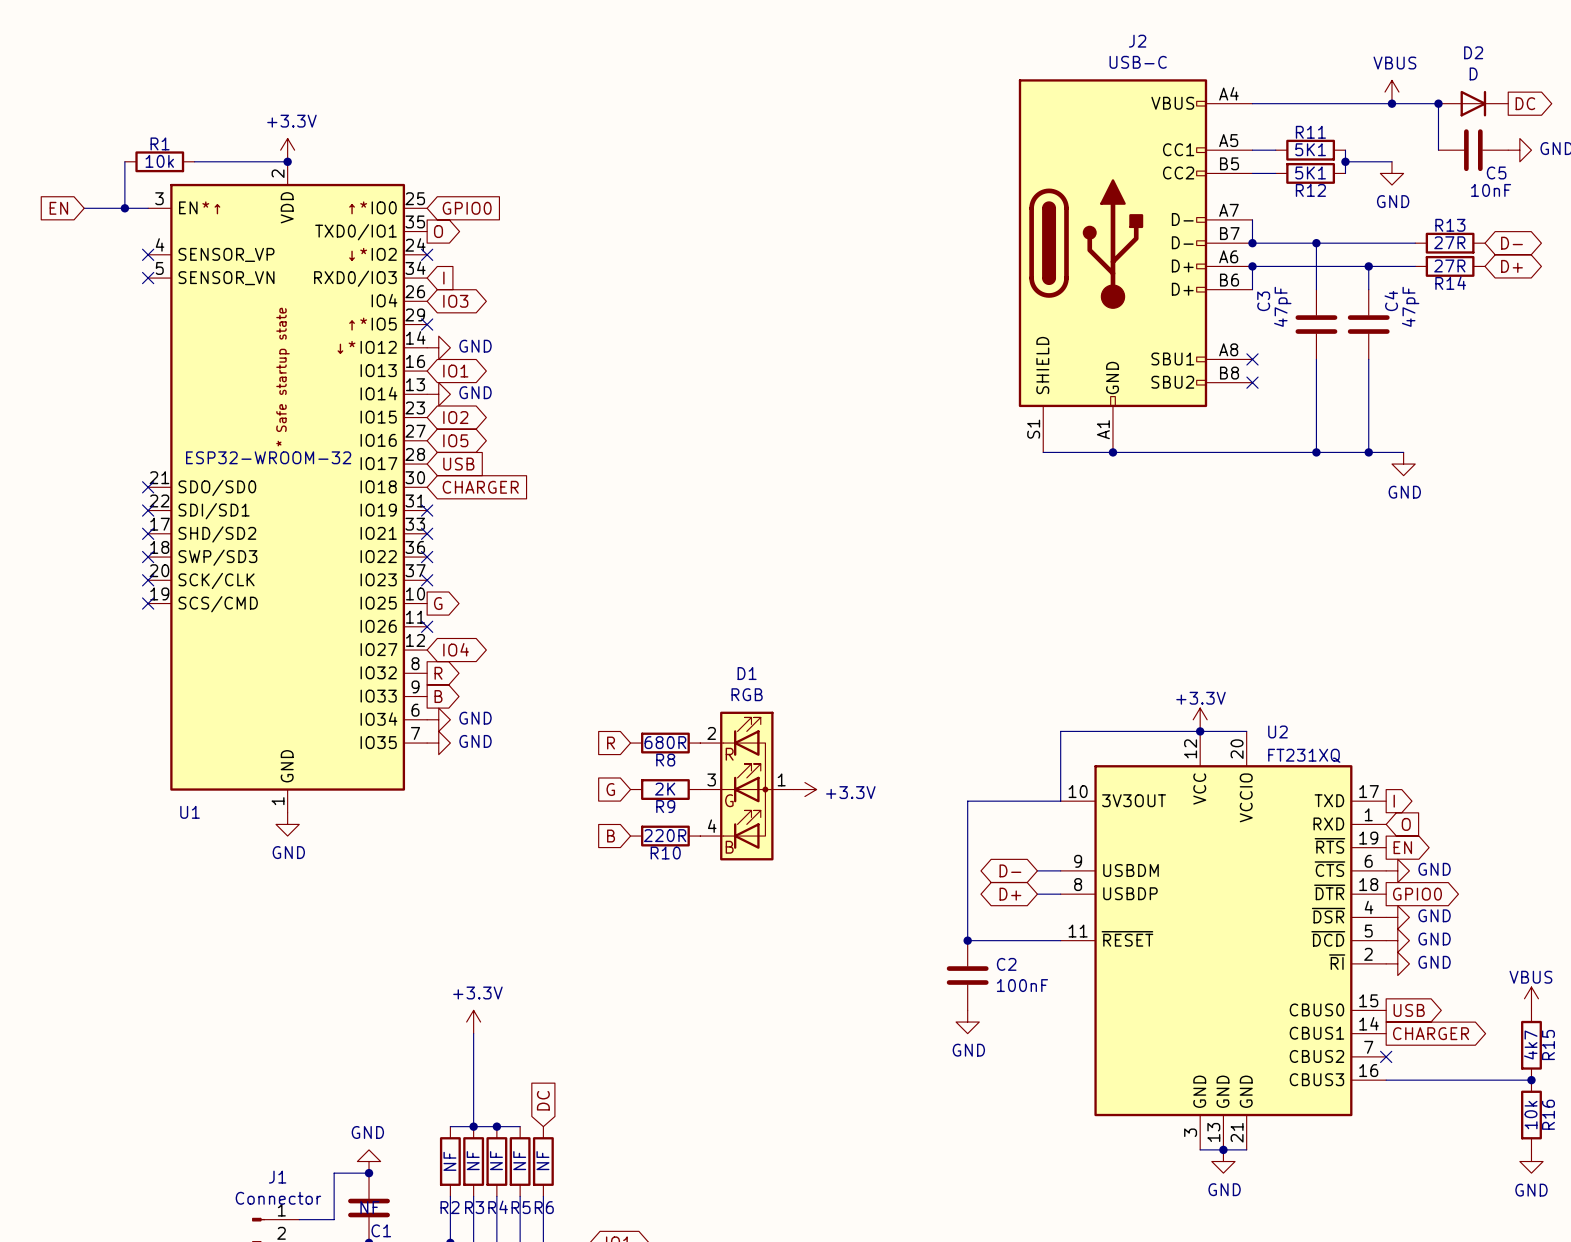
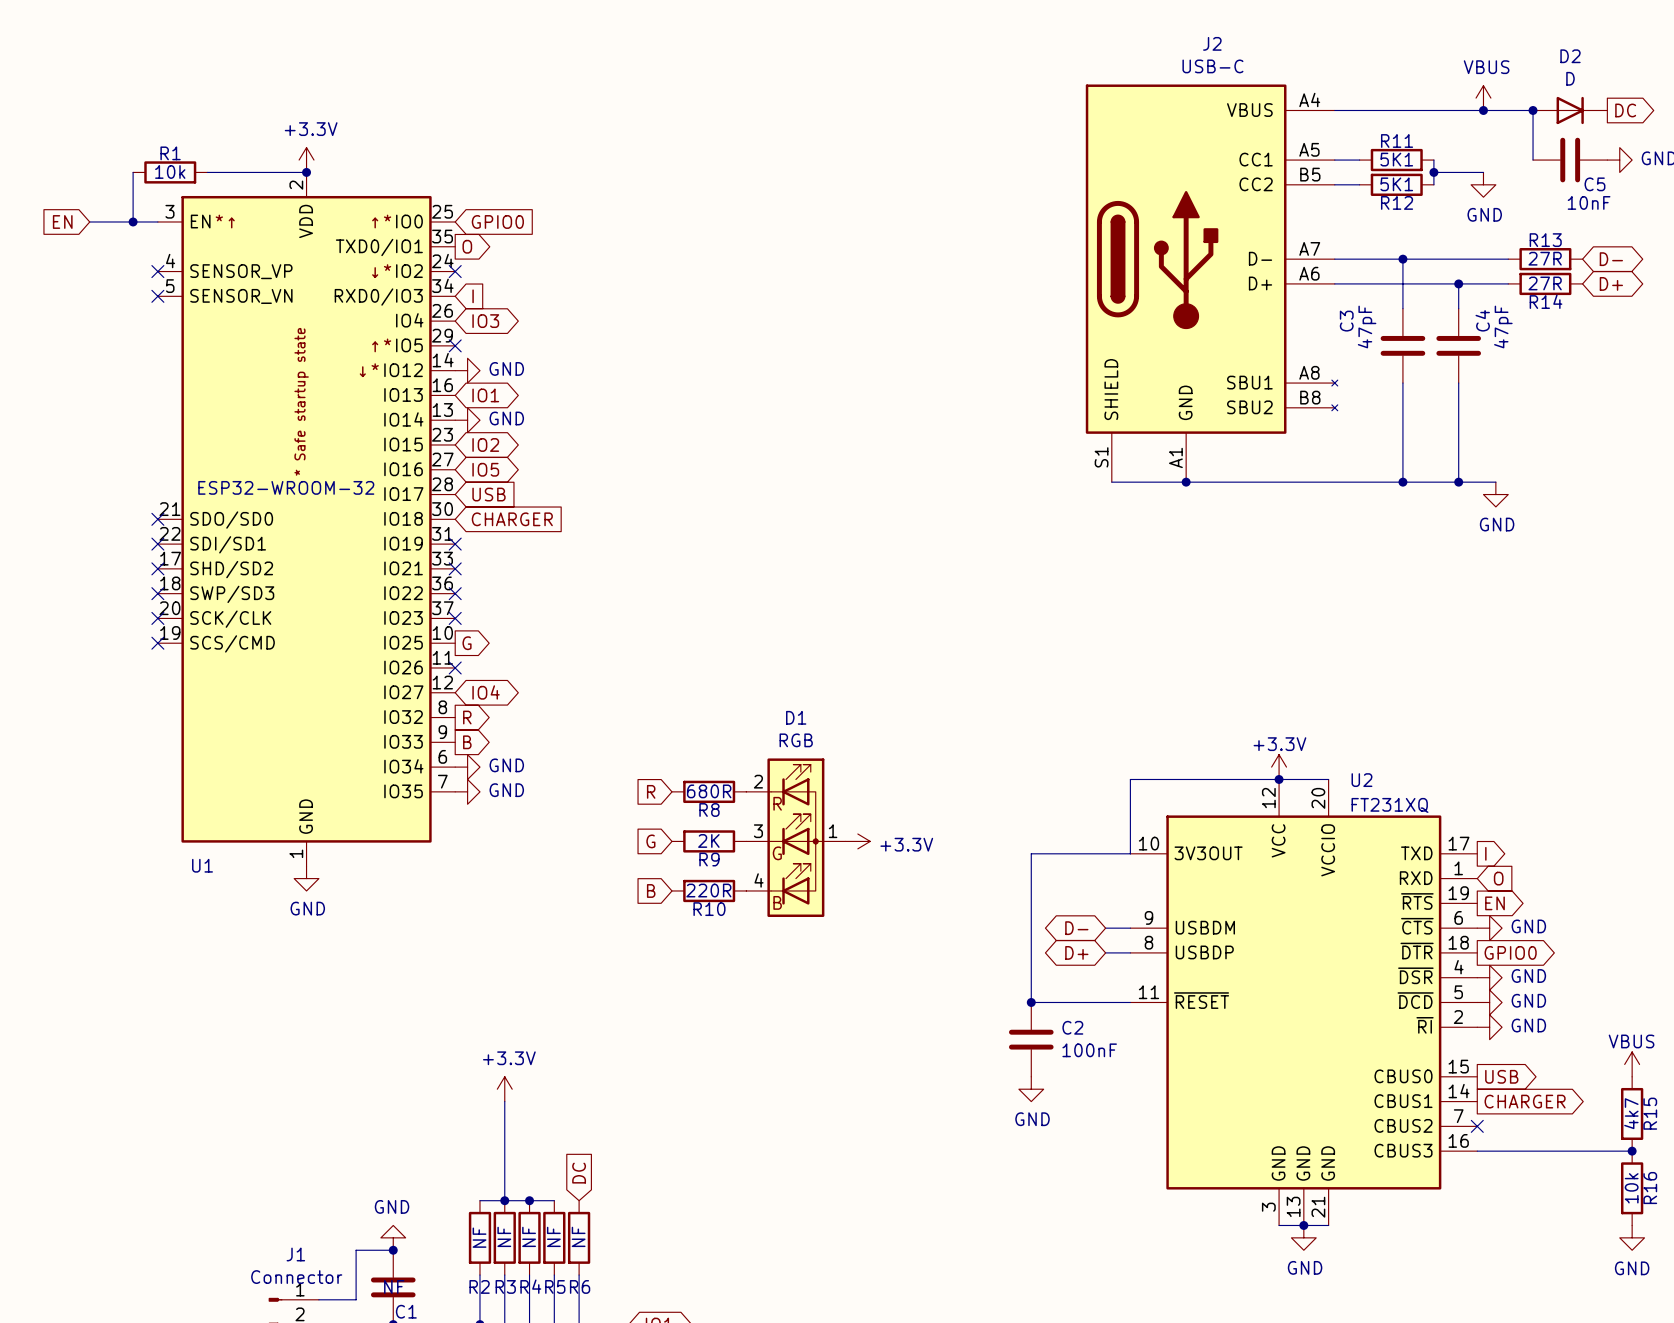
J2 symbol: [1018, 79, 1253, 453] -> [1085, 84, 1338, 483]
wire: (1252, 219) (1252, 243) -> none
junction: (1252, 243) -> none
wire: (1252, 266) (1252, 289) -> none
junction: (1252, 266) -> none
no-connect mark: (1252, 359) -> none
no-connect mark: (1252, 382) -> none

